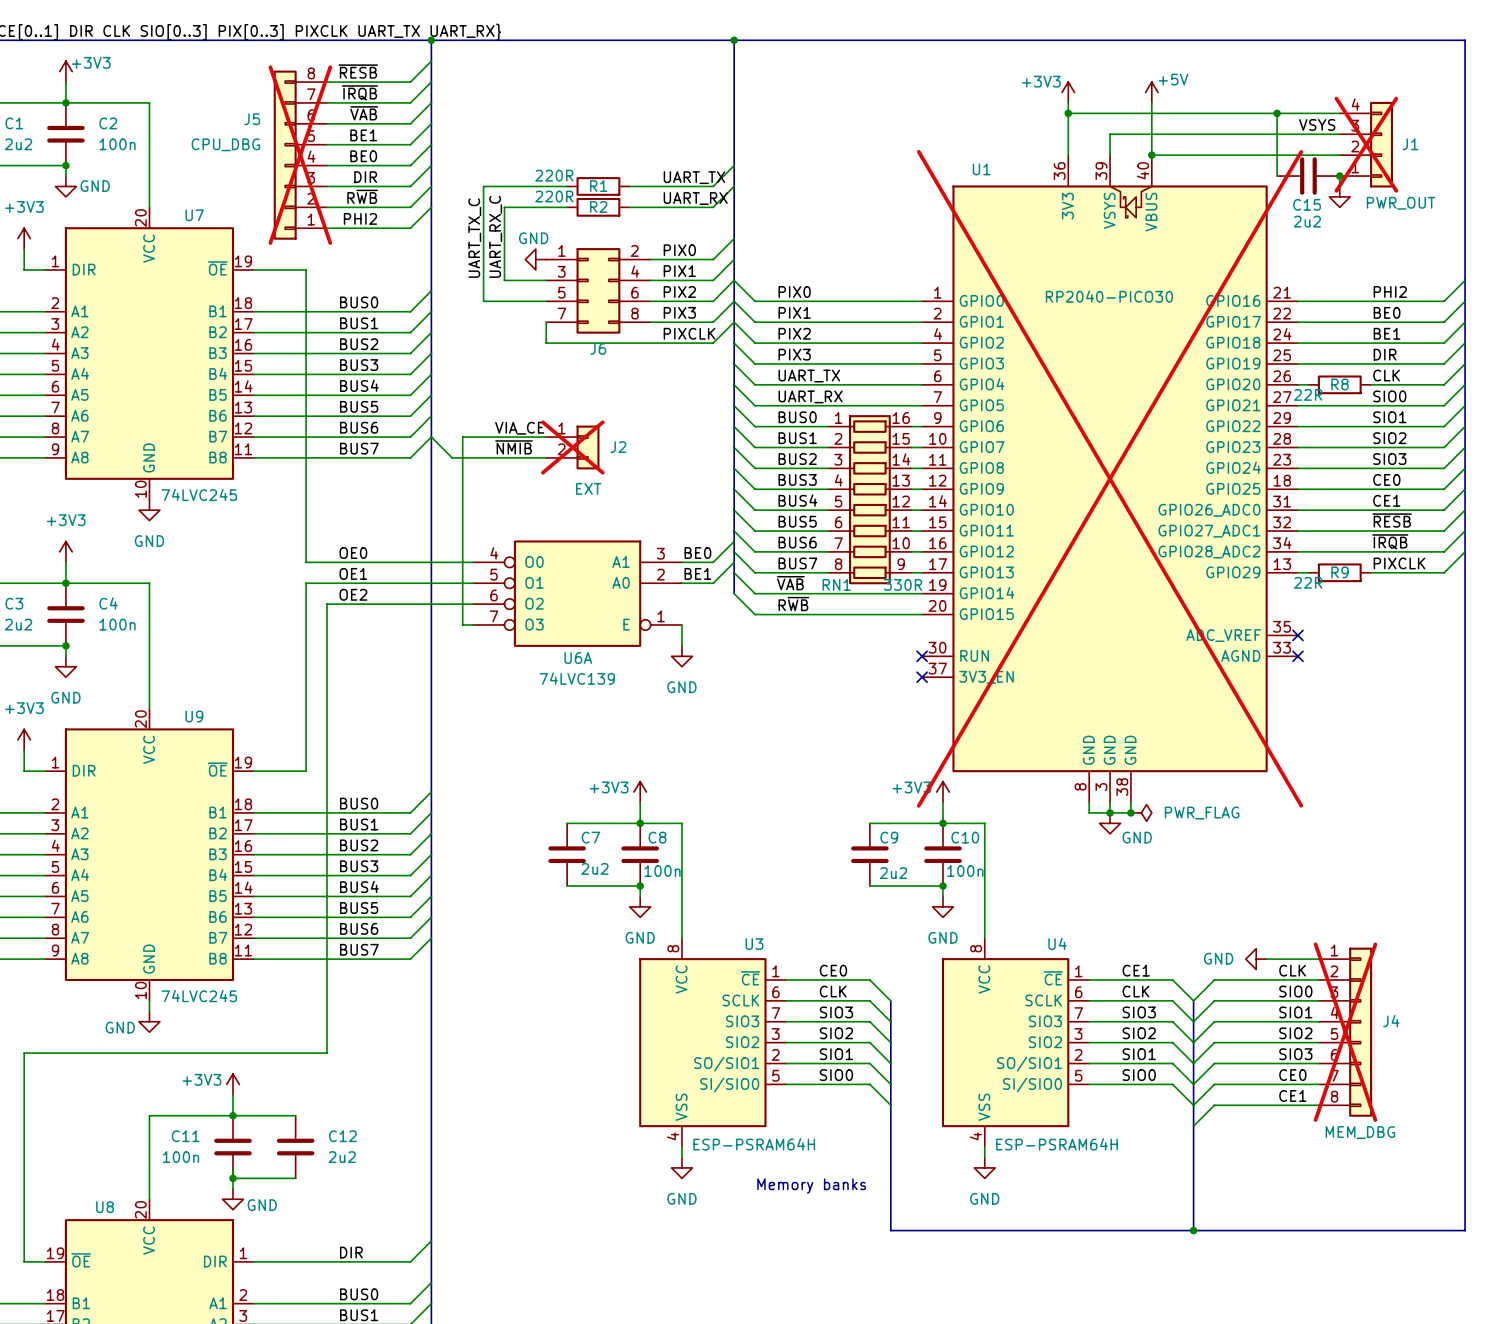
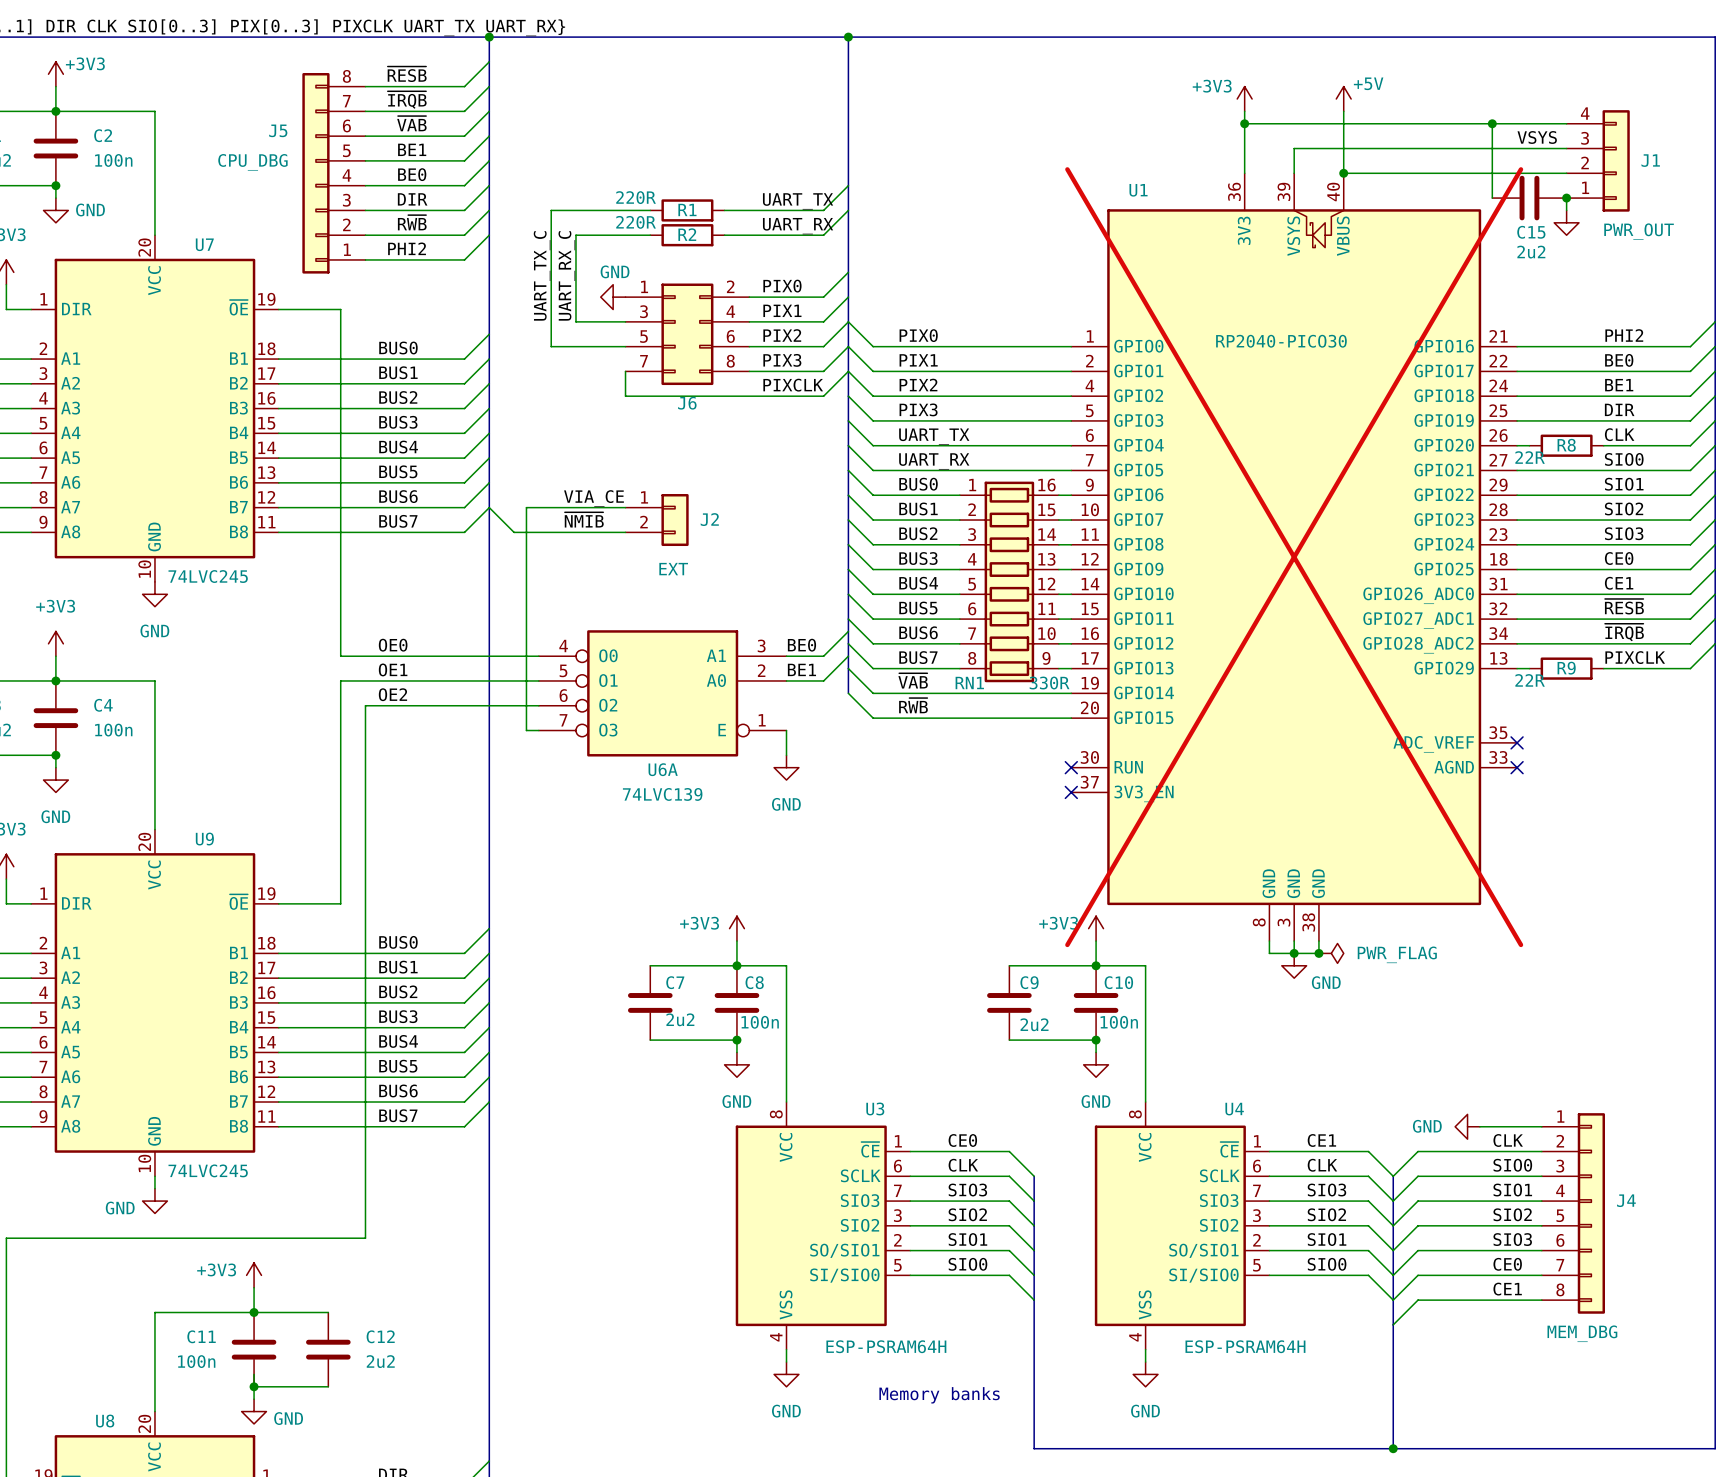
J1 do-not-place cross: (1366, 144) -> none
J5 do-not-place cross: (300, 155) -> none
J2 do-not-place cross: (572, 447) -> none
J4 do-not-place cross: (1345, 1032) -> none

